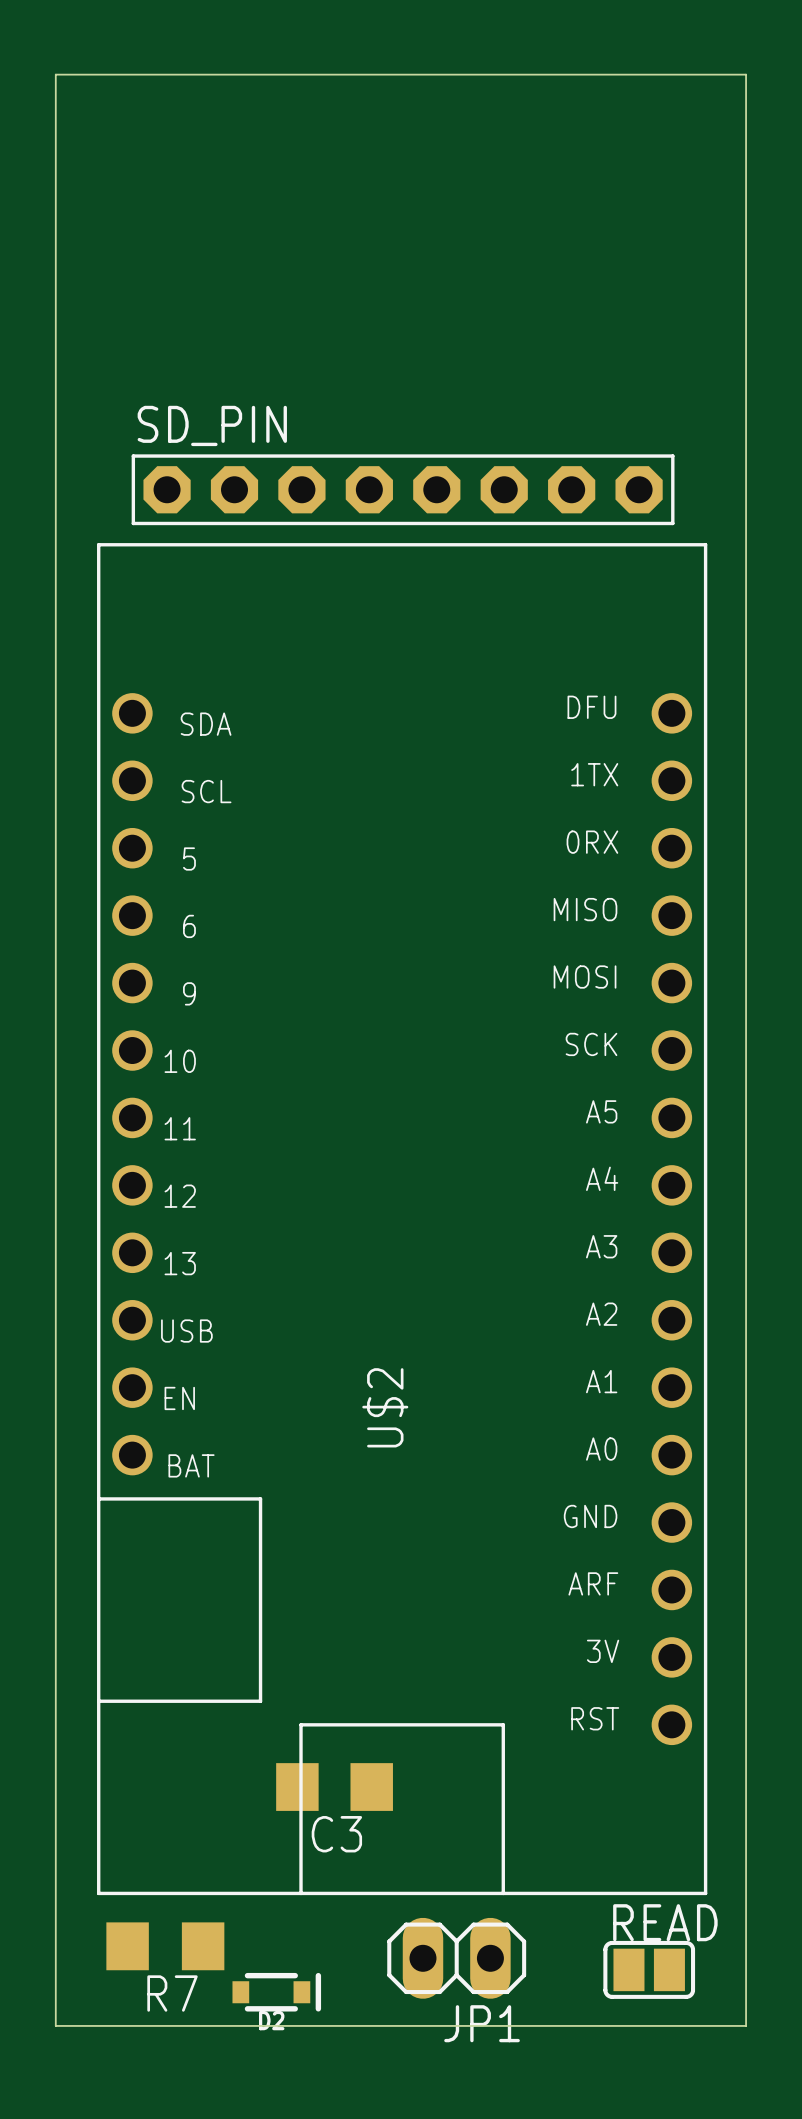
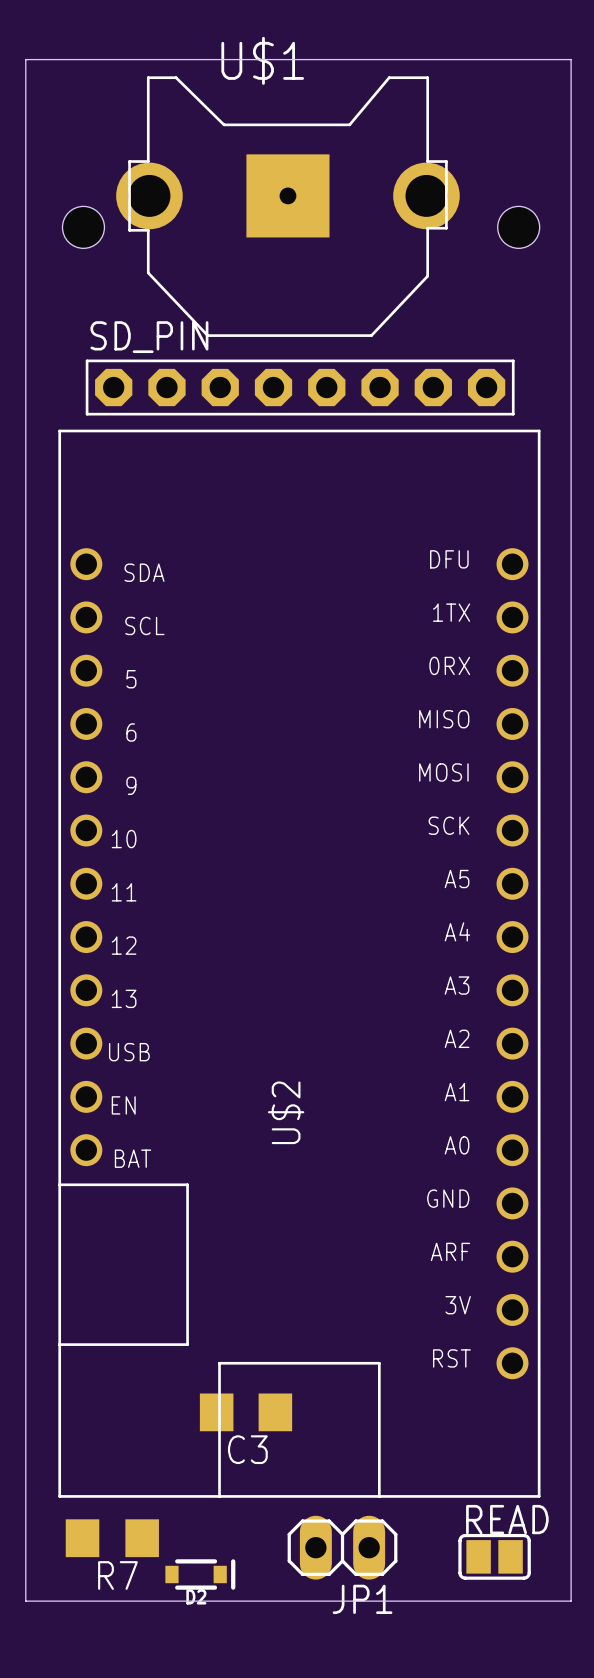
U$1: none -> (287, 206)
hole: none -> (83, 227)
hole: none -> (518, 227)

